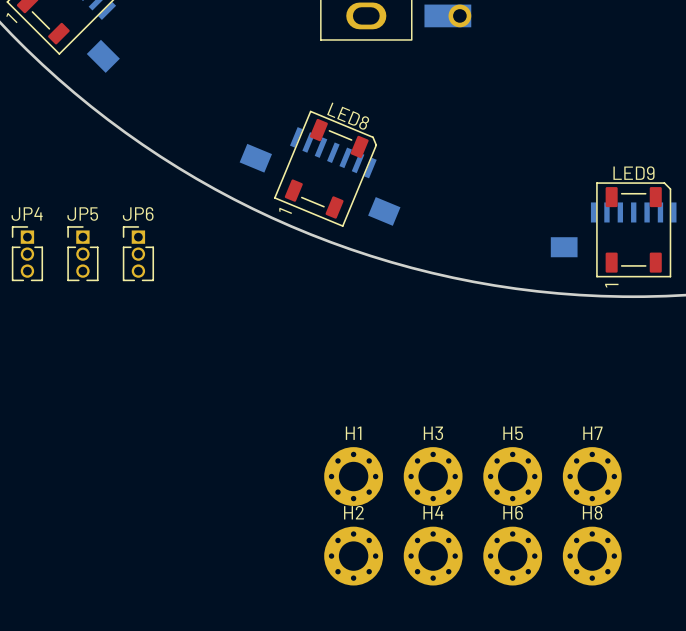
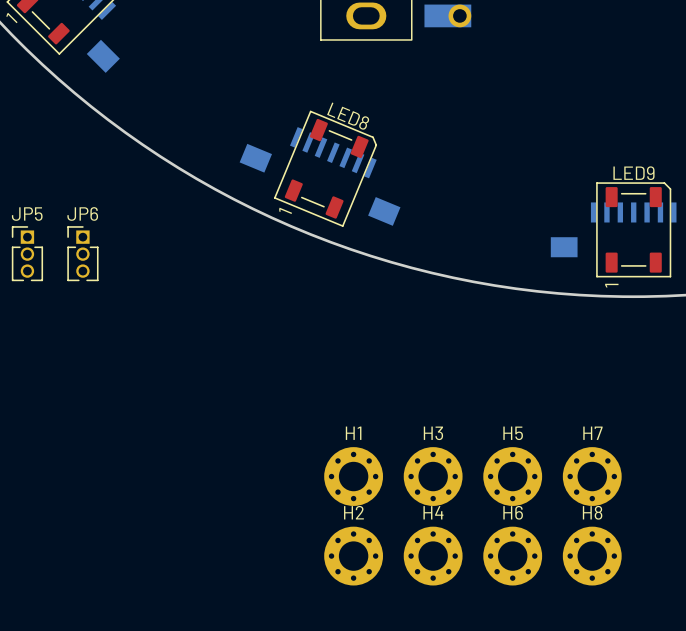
JP4 name: JP4 (27, 214) -> JP5 (27, 214)
JP5 name: JP5 (82, 214) -> JP6 (82, 213)
JP6: (138, 253) -> none

